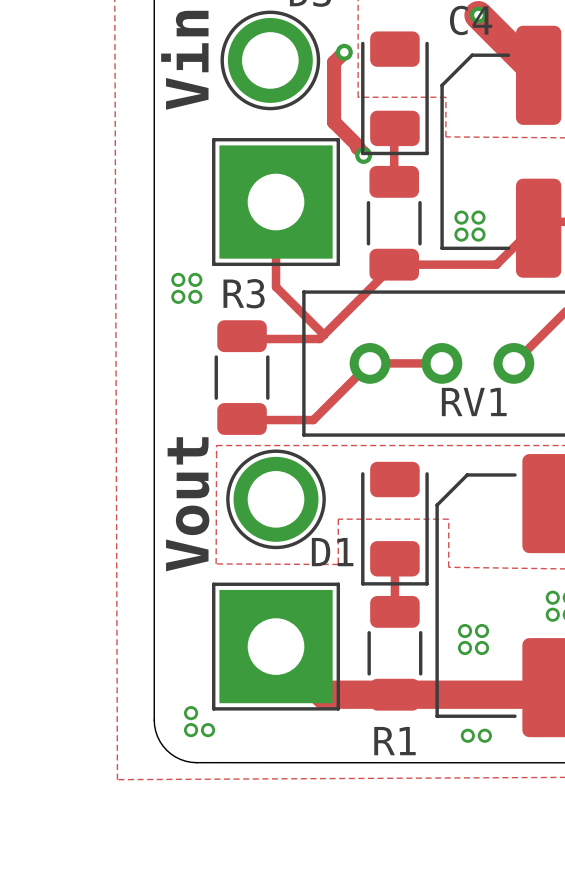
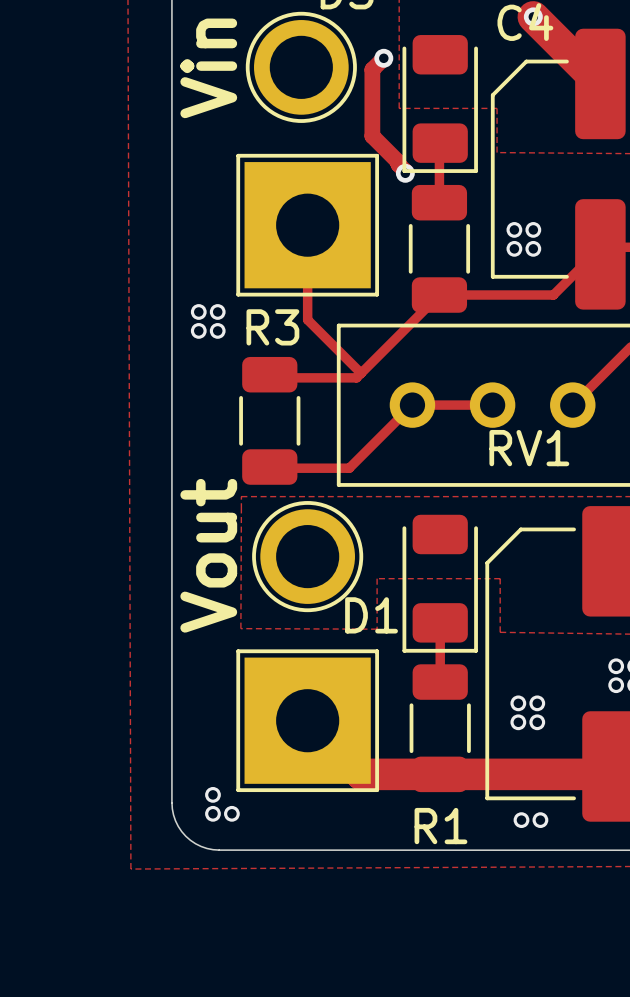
via: none -> (514, 229)
via: none -> (533, 229)
via: (461, 217) -> none
via: (478, 217) -> none
via: none -> (514, 248)
via: none -> (533, 248)
via: (461, 234) -> none
via: (478, 234) -> none

